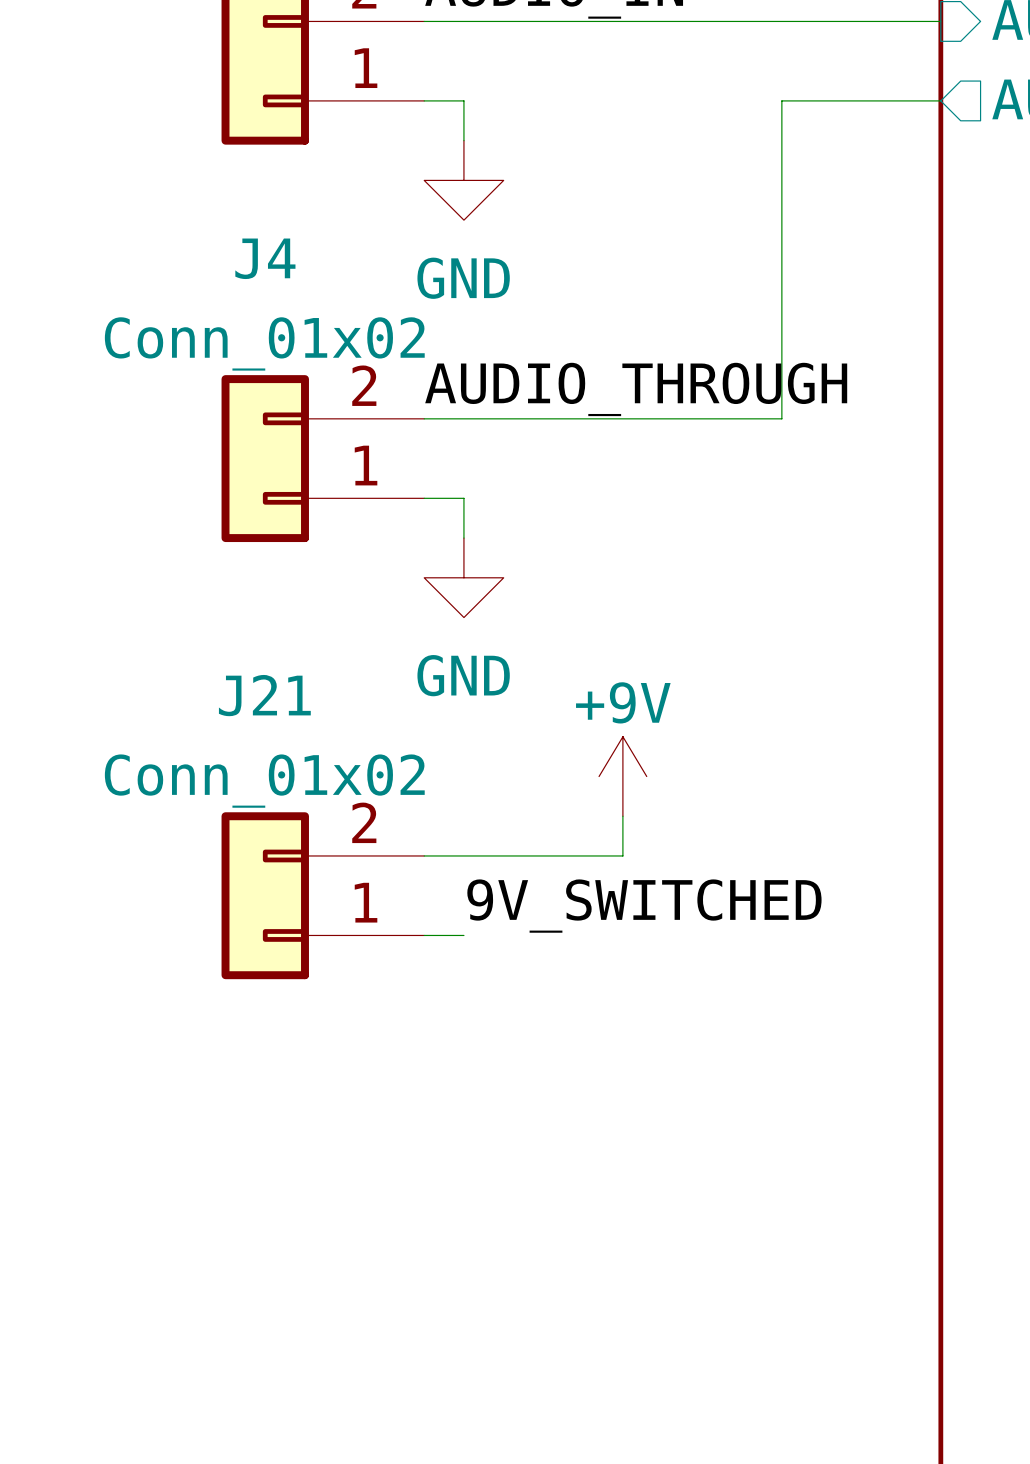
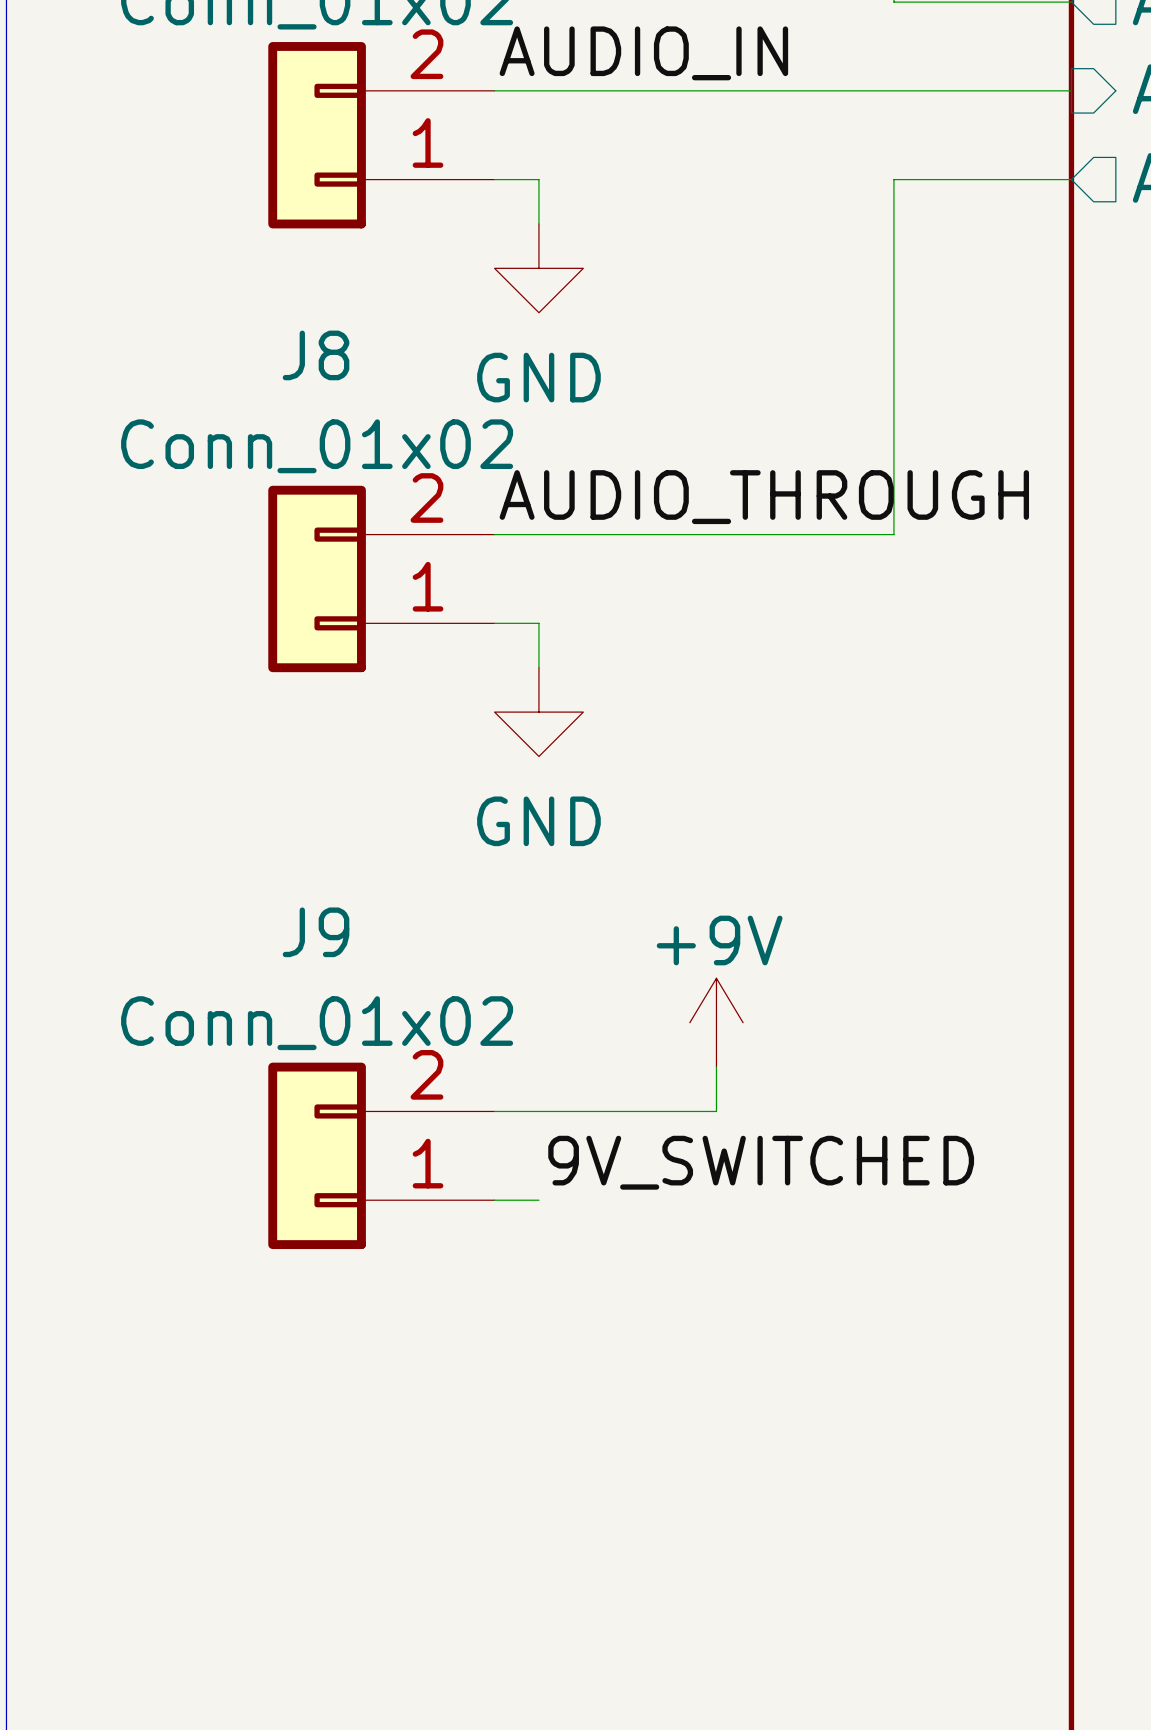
J4 name: J4 (265, 258) -> J8 (316, 355)
power symbol position: +9V (622, 776) -> +9V (716, 1022)
wire: (622, 816) (622, 855) (424, 855) -> none
J21: Conn_01x02 (322, 895) -> none
wire: none -> (716, 1067) (716, 1111) (538, 1111)
label position: 9V_SWITCHED (644, 906) -> 9V_SWITCHED (761, 1162)
J9: none -> Conn_01x02 (381, 1155)
wire: none -> (494, 1200) (538, 1200)

